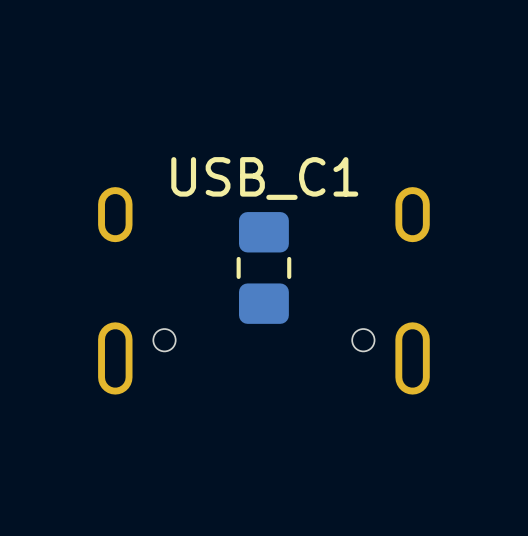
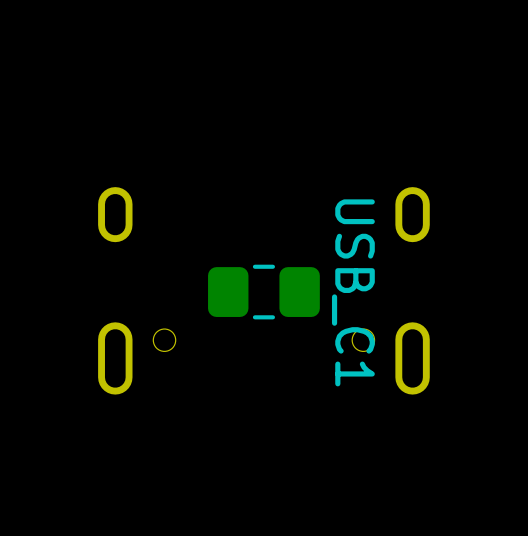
USB_C1 rotation: 0° (263, 267) -> 90° clockwise (263, 292)

